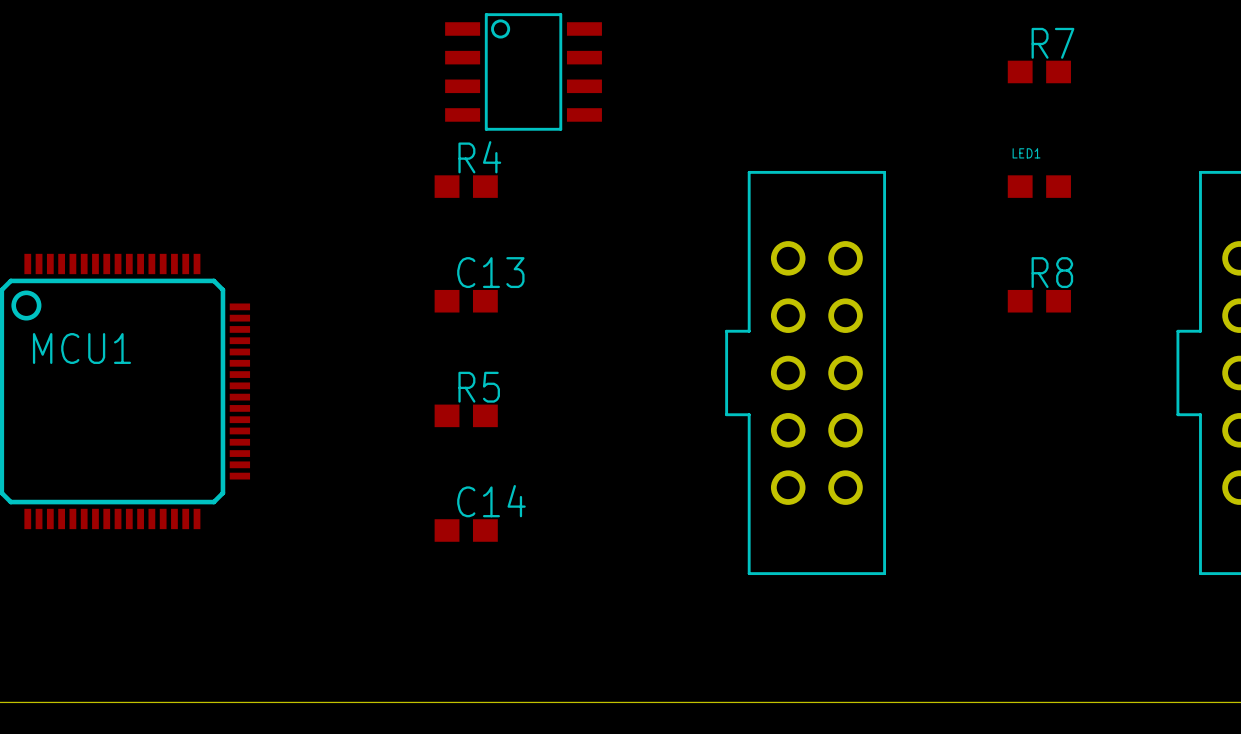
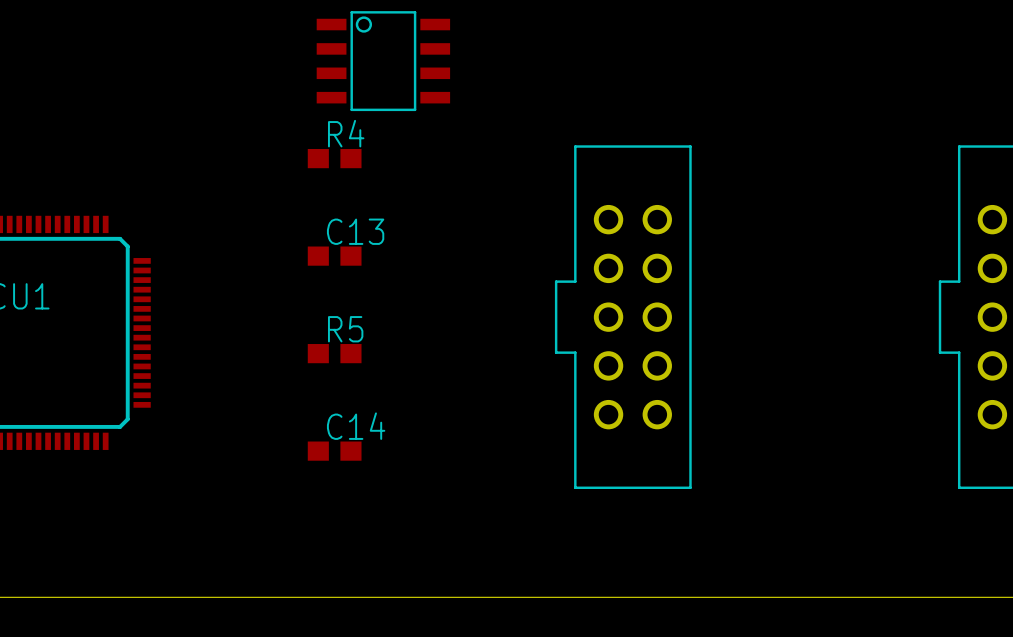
R7: (1039, 71) -> none
LED1: (1039, 186) -> none
R8: (1039, 301) -> none

